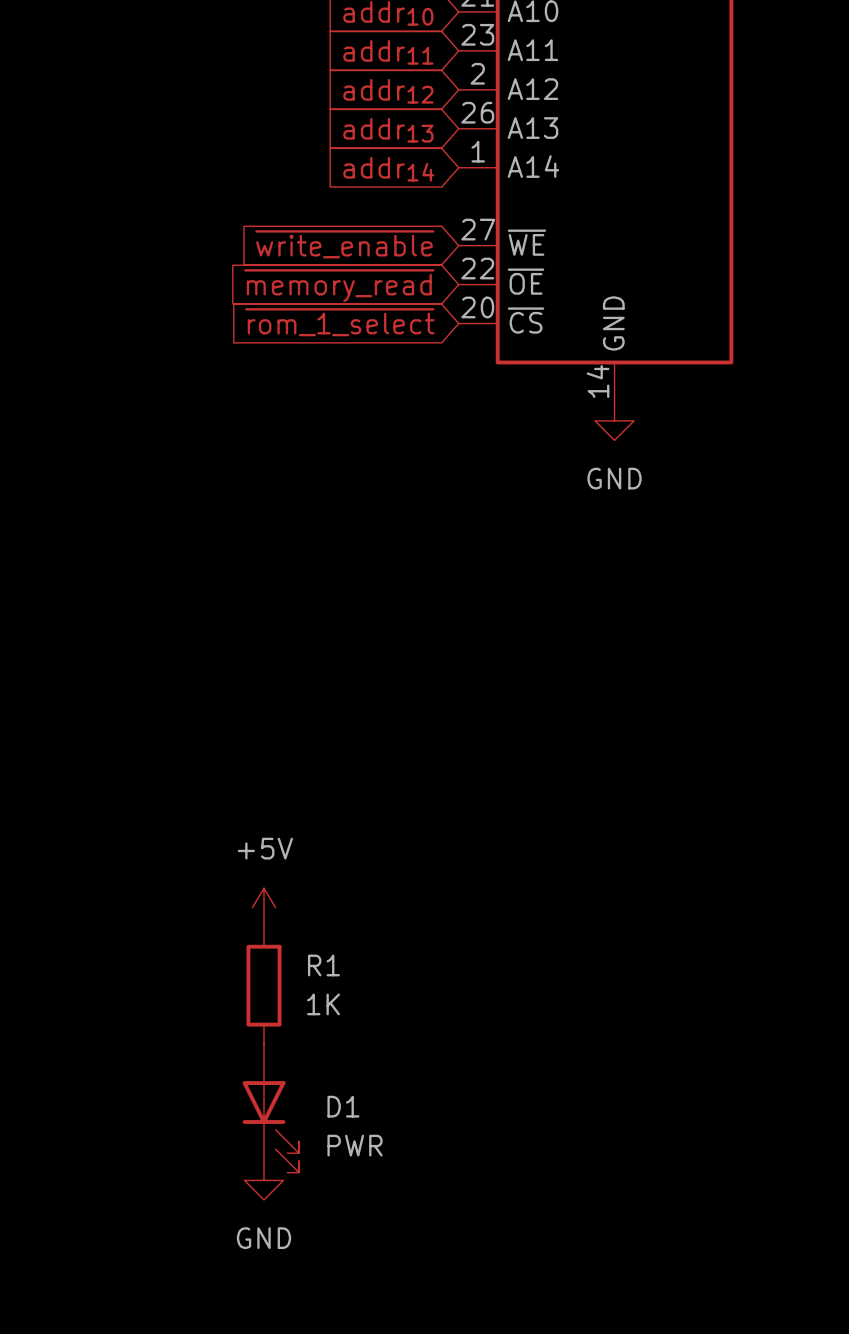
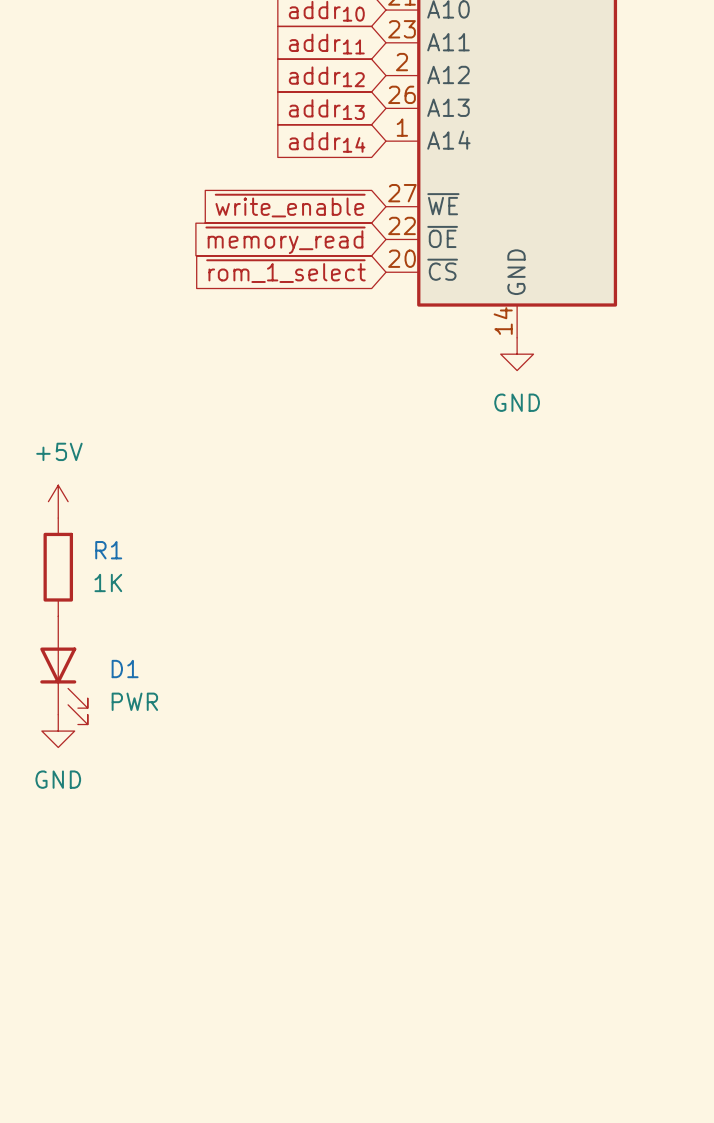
power symbol position: +5V (263, 907) -> +5V (58, 501)
R1 position: (263, 985) -> (58, 567)
D1 position: (270, 1108) -> (64, 670)
power symbol position: GND (263, 1180) -> GND (58, 731)

